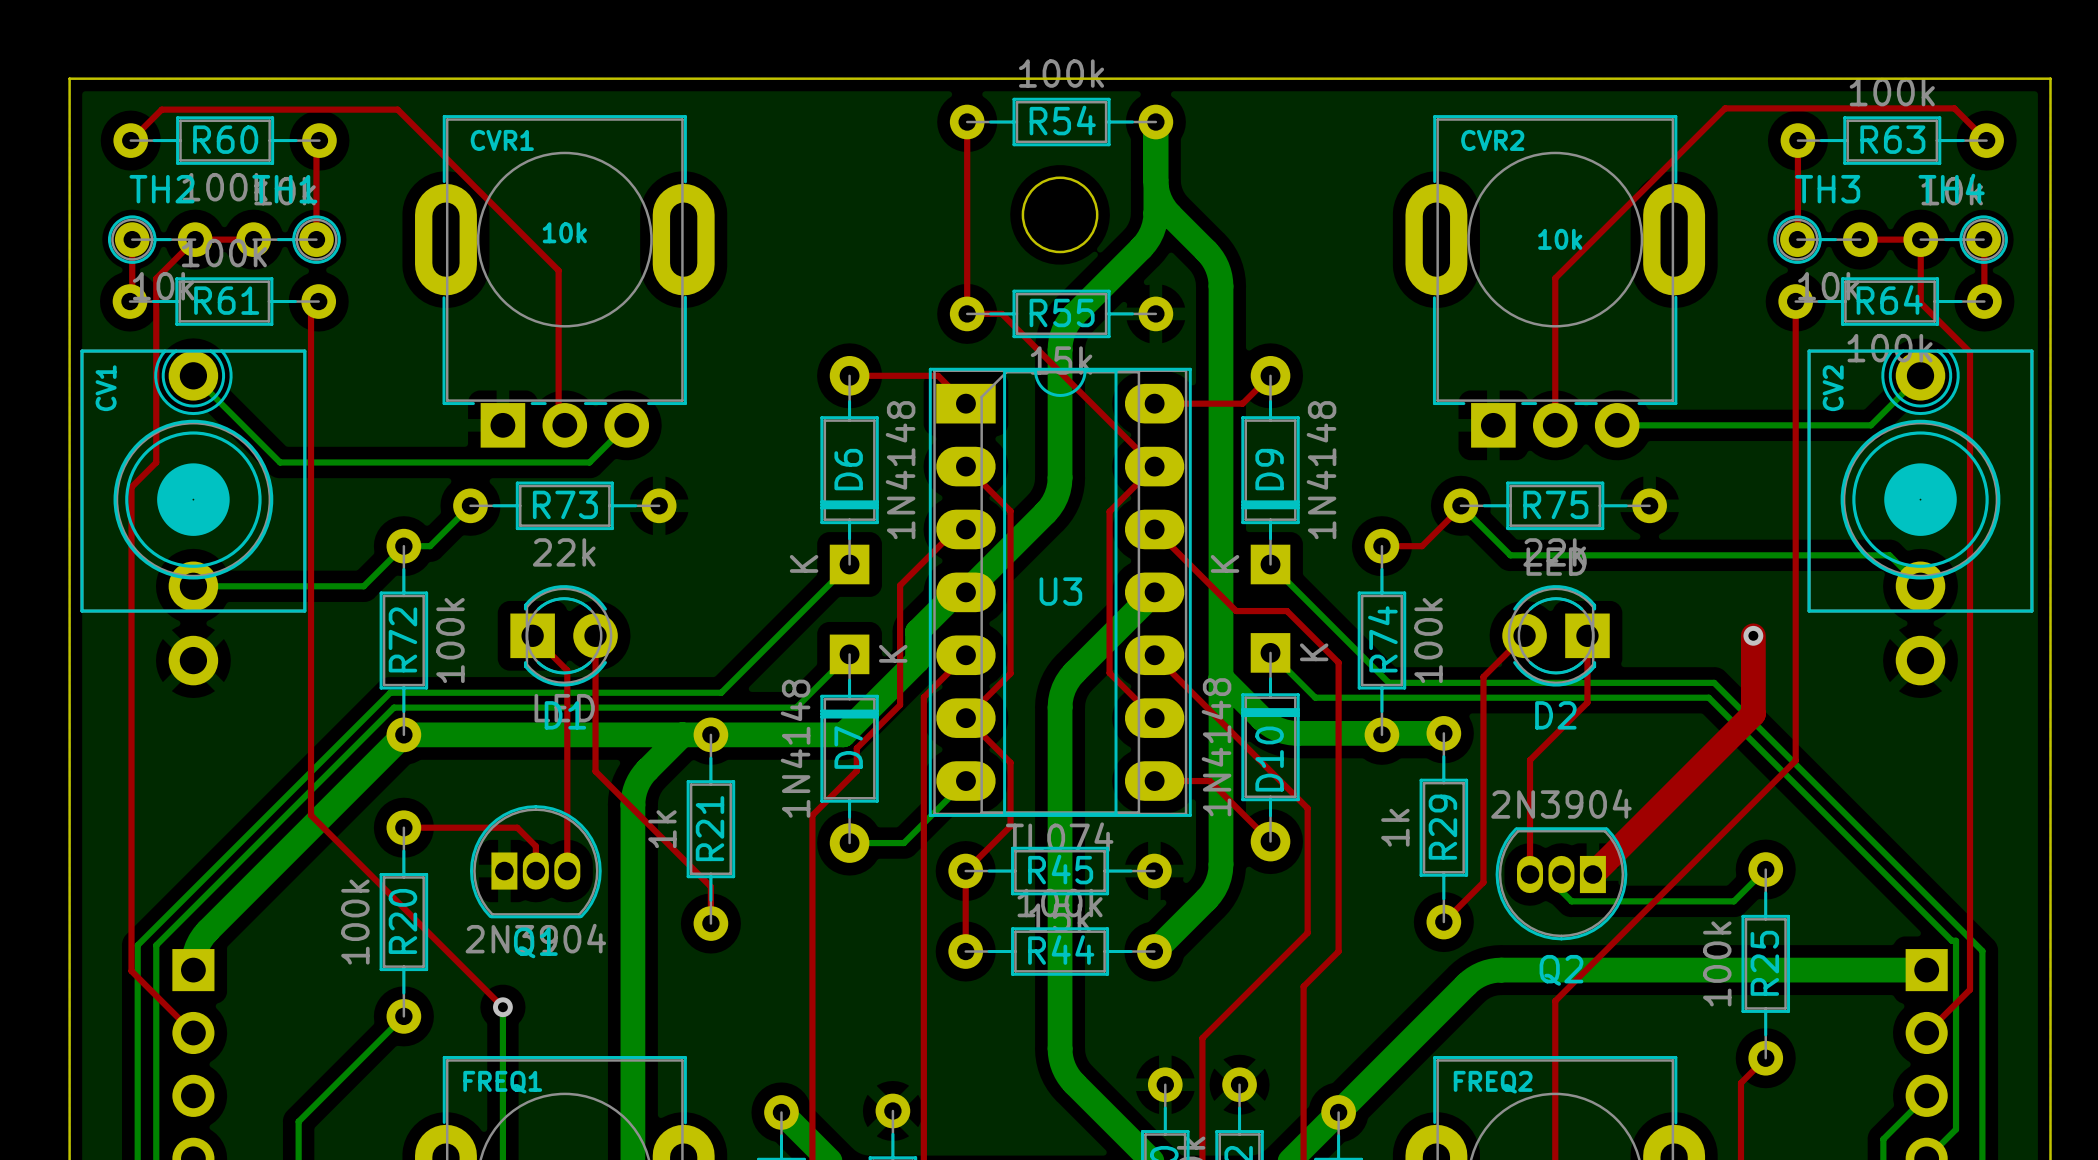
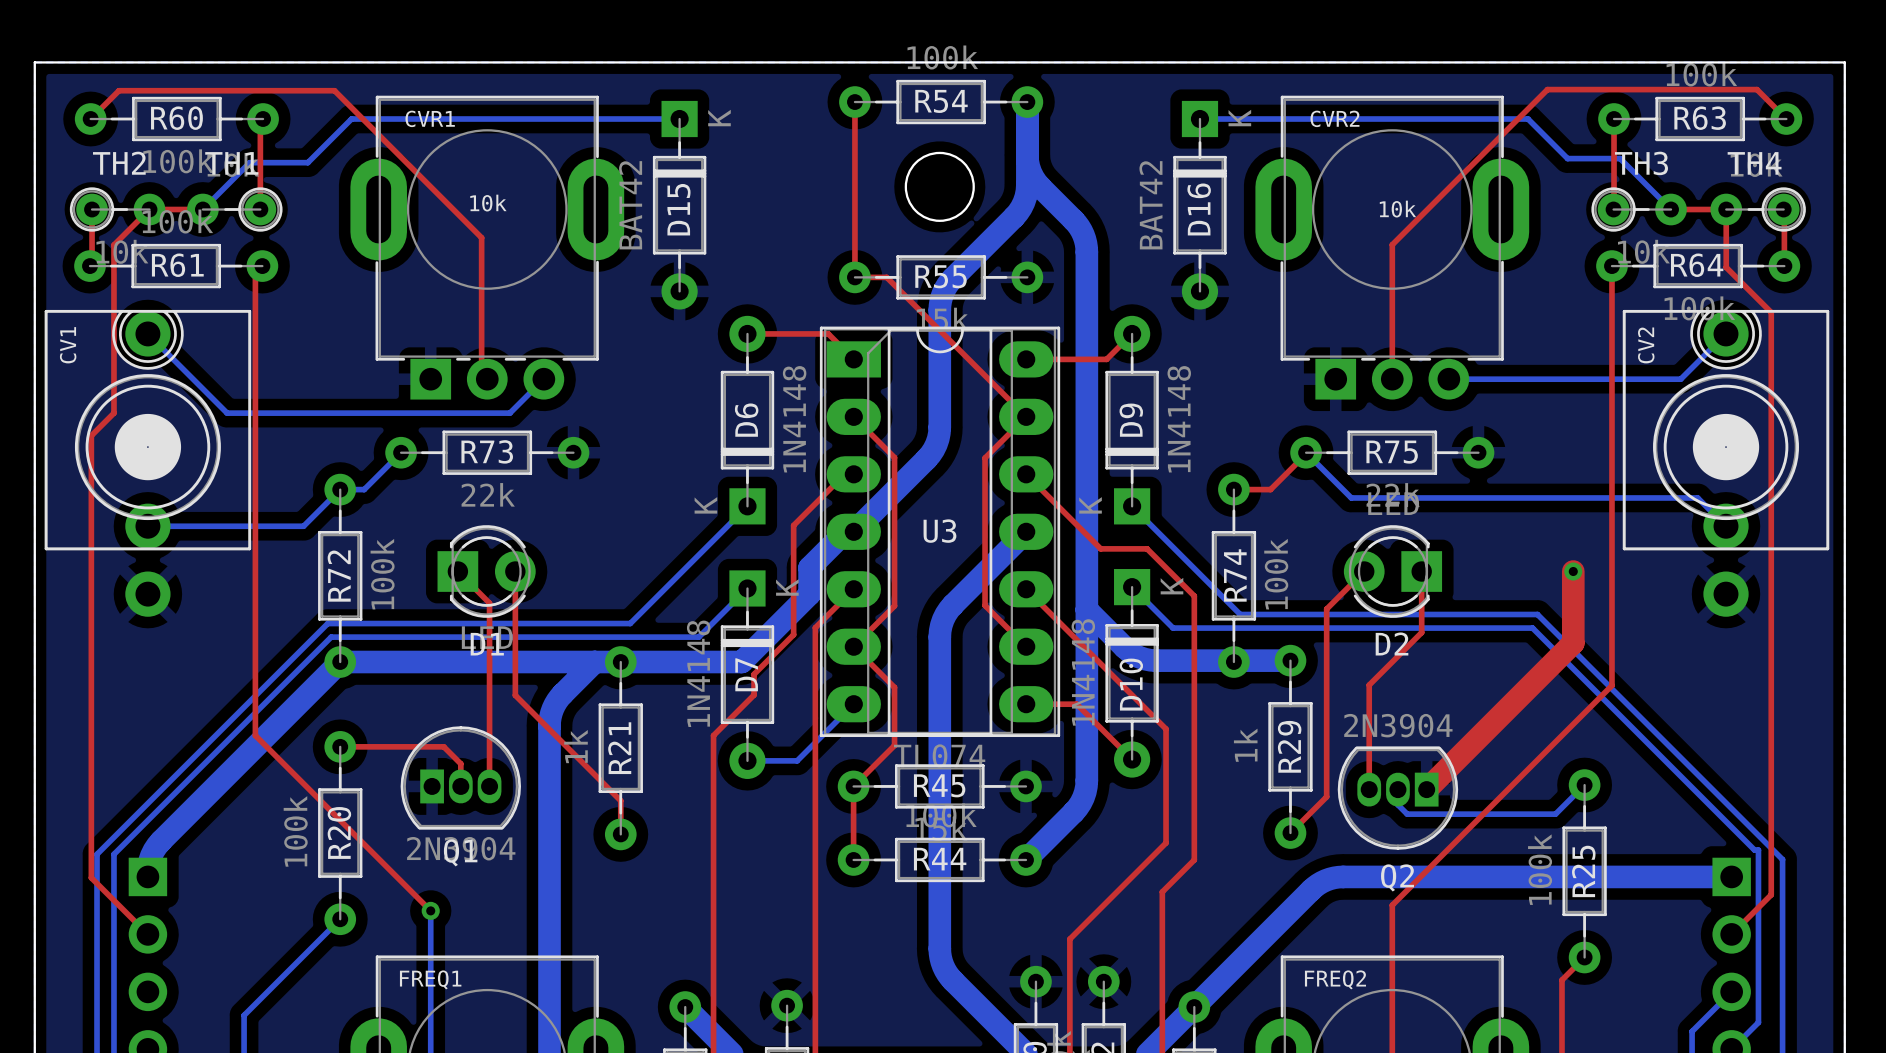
bottom track: none -> (679, 119) (351, 119) (307, 162) (249, 162) (202, 209)
bottom track: none -> (1199, 119) (1528, 119) (1567, 158) (1620, 158) (1671, 209)
D15: none -> BAT42 (679, 205)
D16: none -> BAT42 (1199, 205)

